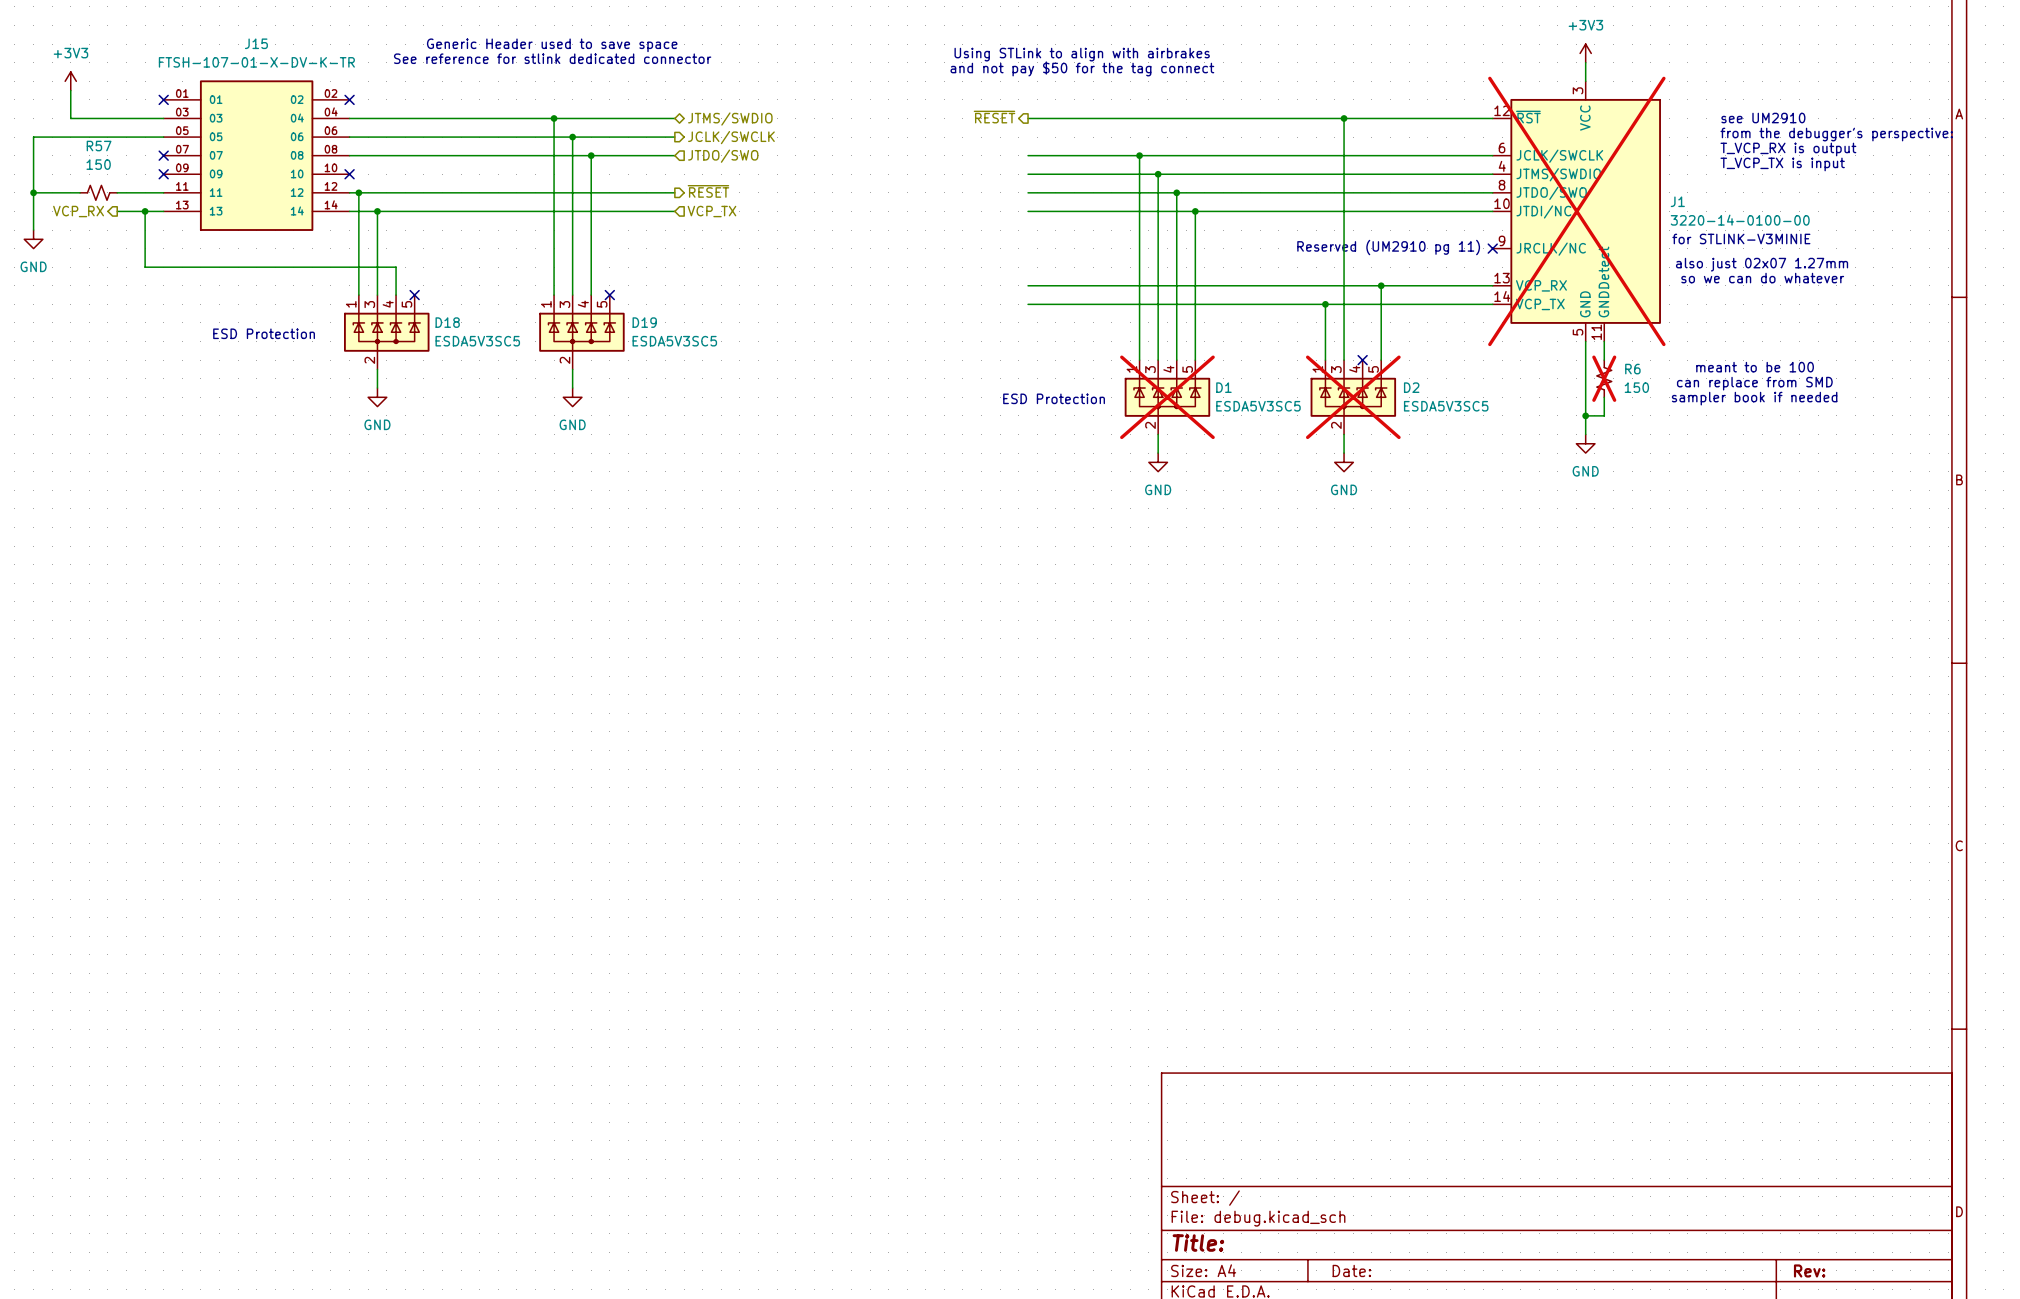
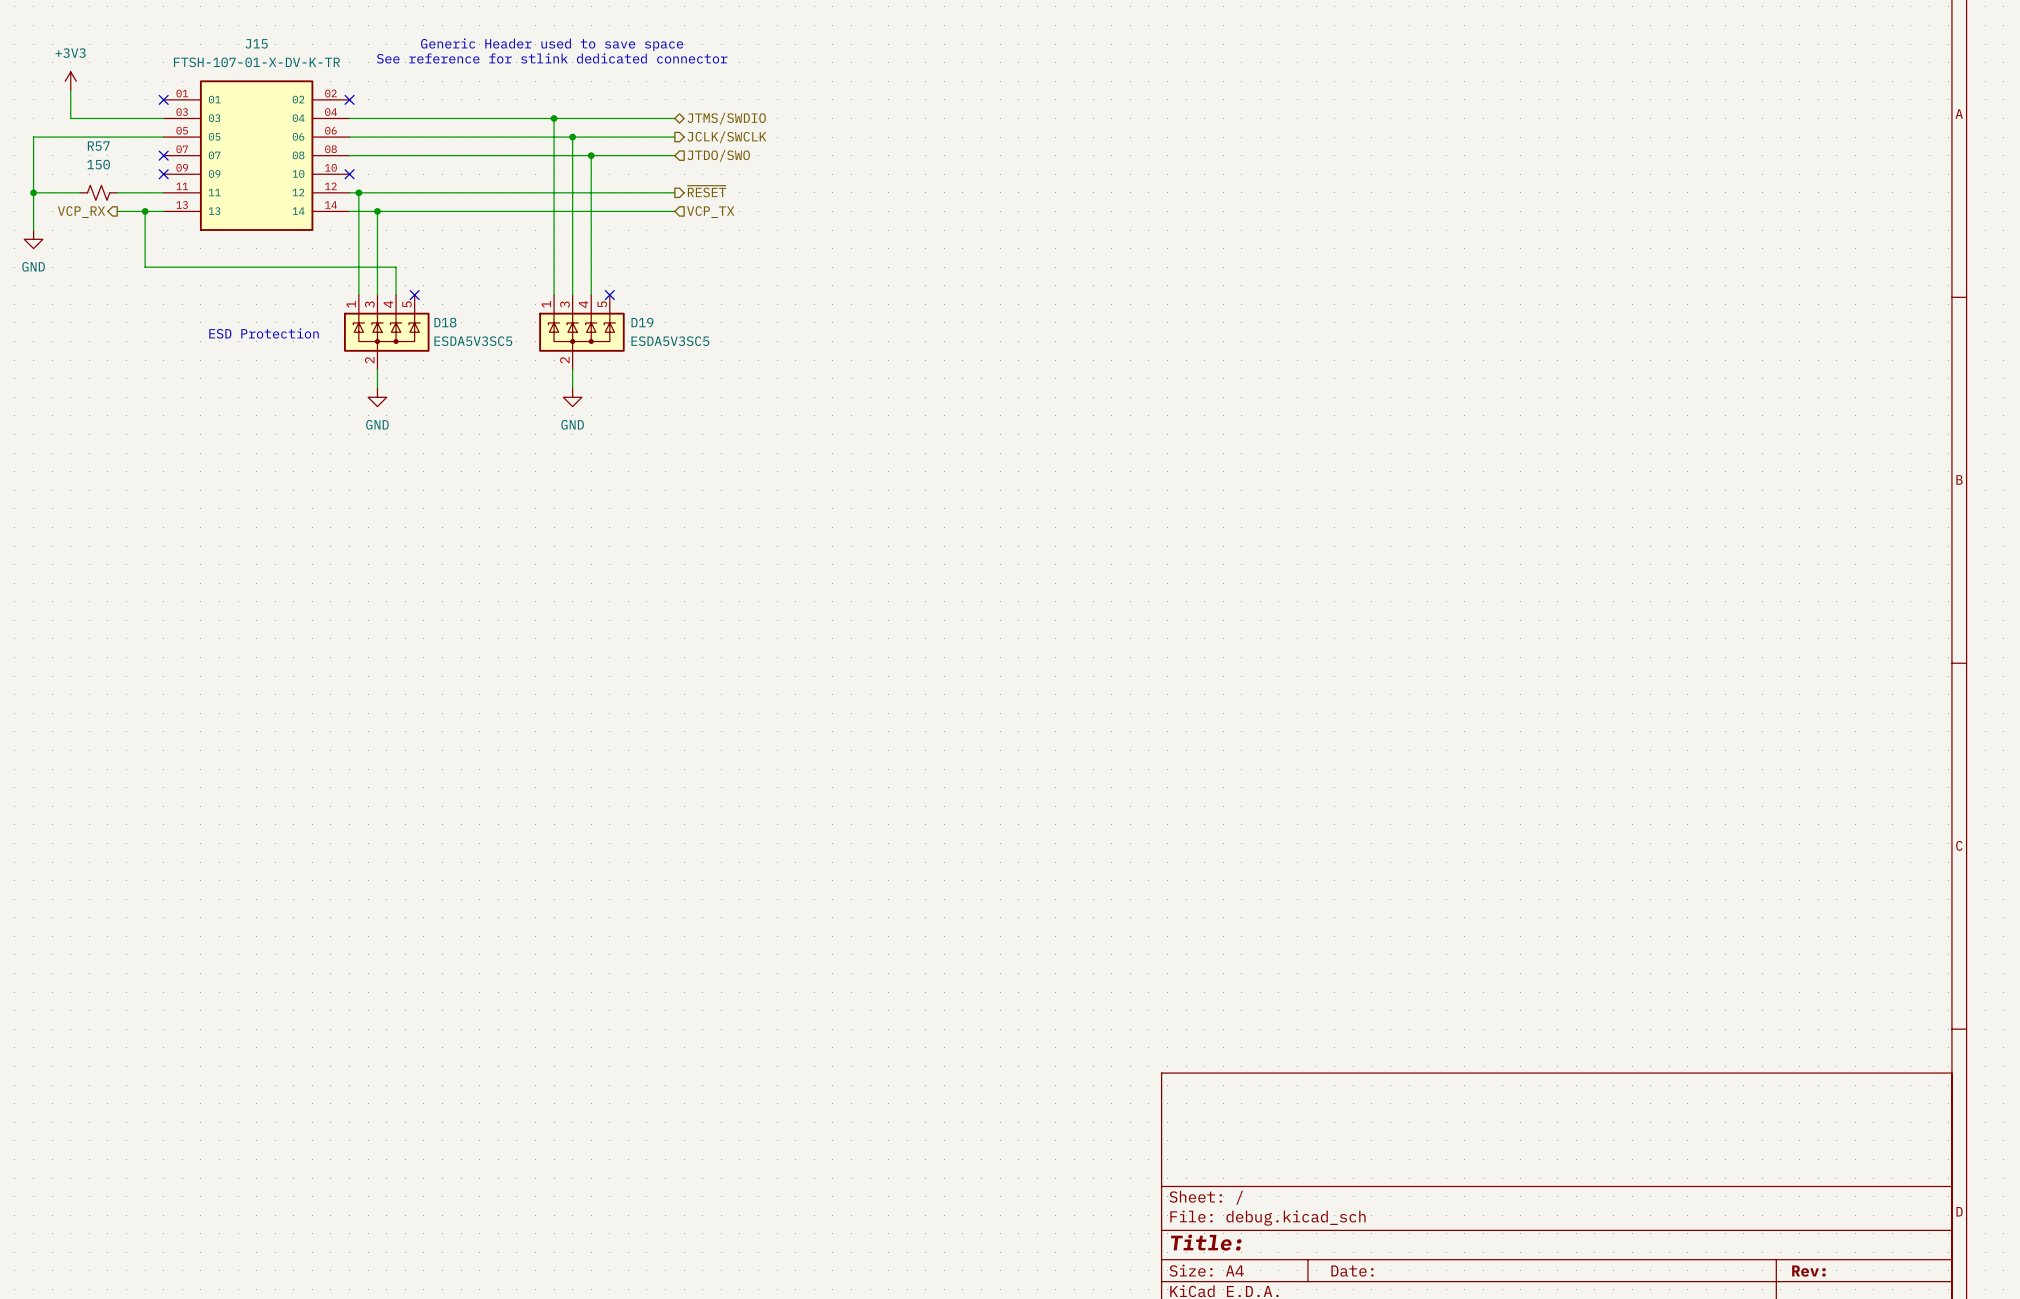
power symbol: +3V3 (1585, 53) -> none
text: Using STLink to align with airbrakes (1082, 54) -> none
wire: (1585, 62) (1585, 81) -> none
text: and not pay $50 for the tag connect (1082, 68) -> none
hierarchical label: ~{RESET} (994, 117) -> none
wire: (1028, 118) (1492, 118) -> none
wire: (1344, 118) (1344, 360) -> none
junction: (1344, 118) -> none
text: see UM2910 (1763, 118) -> none
text: from the debugger's perspective: (1836, 134) -> none
text: T_VCP_RX is output (1788, 149) -> none
wire: (1028, 155) (1492, 155) -> none
wire: (1139, 155) (1139, 360) -> none
junction: (1139, 155) -> none
text: T_VCP_TX is input (1782, 164) -> none
wire: (1028, 174) (1492, 174) -> none
wire: (1158, 174) (1158, 360) -> none
junction: (1158, 174) -> none
wire: (1028, 192) (1492, 192) -> none
wire: (1176, 192) (1176, 360) -> none
junction: (1176, 192) -> none
wire: (1028, 211) (1492, 211) -> none
wire: (1195, 211) (1195, 360) -> none
junction: (1195, 211) -> none
J1: 3220-14-0100-00 (1576, 211) -> none
text: for STLINK-V3MINIE (1741, 238) -> none
text: Reserved (UM2910 pg 11) (1388, 247) -> none
no-connect mark: (1492, 248) -> none
text: also just 02x07 1.27mm (1762, 264) -> none
text: so we can do whatever (1762, 278) -> none
wire: (1028, 285) (1492, 285) -> none
wire: (1381, 285) (1381, 360) -> none
junction: (1381, 285) -> none
wire: (1028, 304) (1492, 304) -> none
wire: (1325, 304) (1325, 360) -> none
junction: (1325, 304) -> none
wire: (1585, 341) (1585, 434) -> none
wire: (1604, 341) (1604, 360) -> none
no-connect mark: (1362, 360) -> none
text: meant to be 100 (1755, 367) -> none
R6: 150 (1604, 378) -> none
text: can replace from SMD (1754, 383) -> none
D1: ESDA5V3SC5 (1167, 397) -> none
D2: ESDA5V3SC5 (1353, 397) -> none
wire: (1604, 397) (1604, 415) (1585, 415) -> none
text: ESD Protection (1054, 398) -> none
text: sampler book if needed (1754, 398) -> none
junction: (1585, 415) -> none
wire: (1158, 434) (1158, 453) -> none
wire: (1344, 434) (1344, 453) -> none
power symbol: GND (1585, 443) -> none
power symbol: GND (1158, 462) -> none
power symbol: GND (1344, 462) -> none

